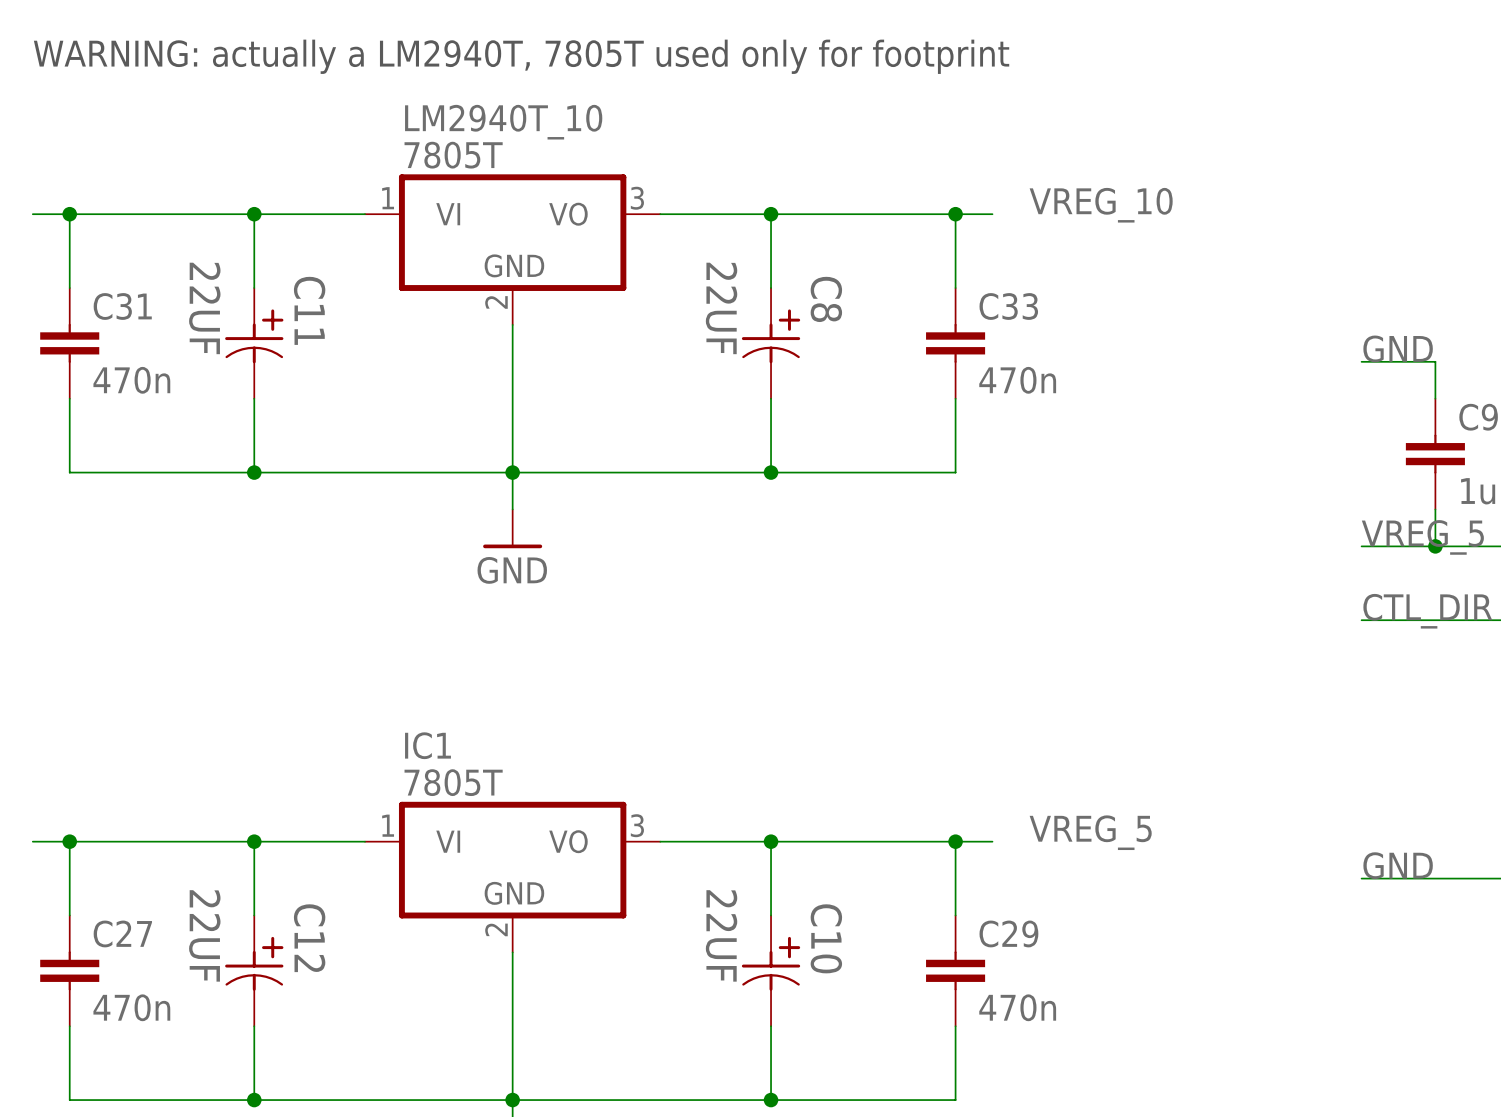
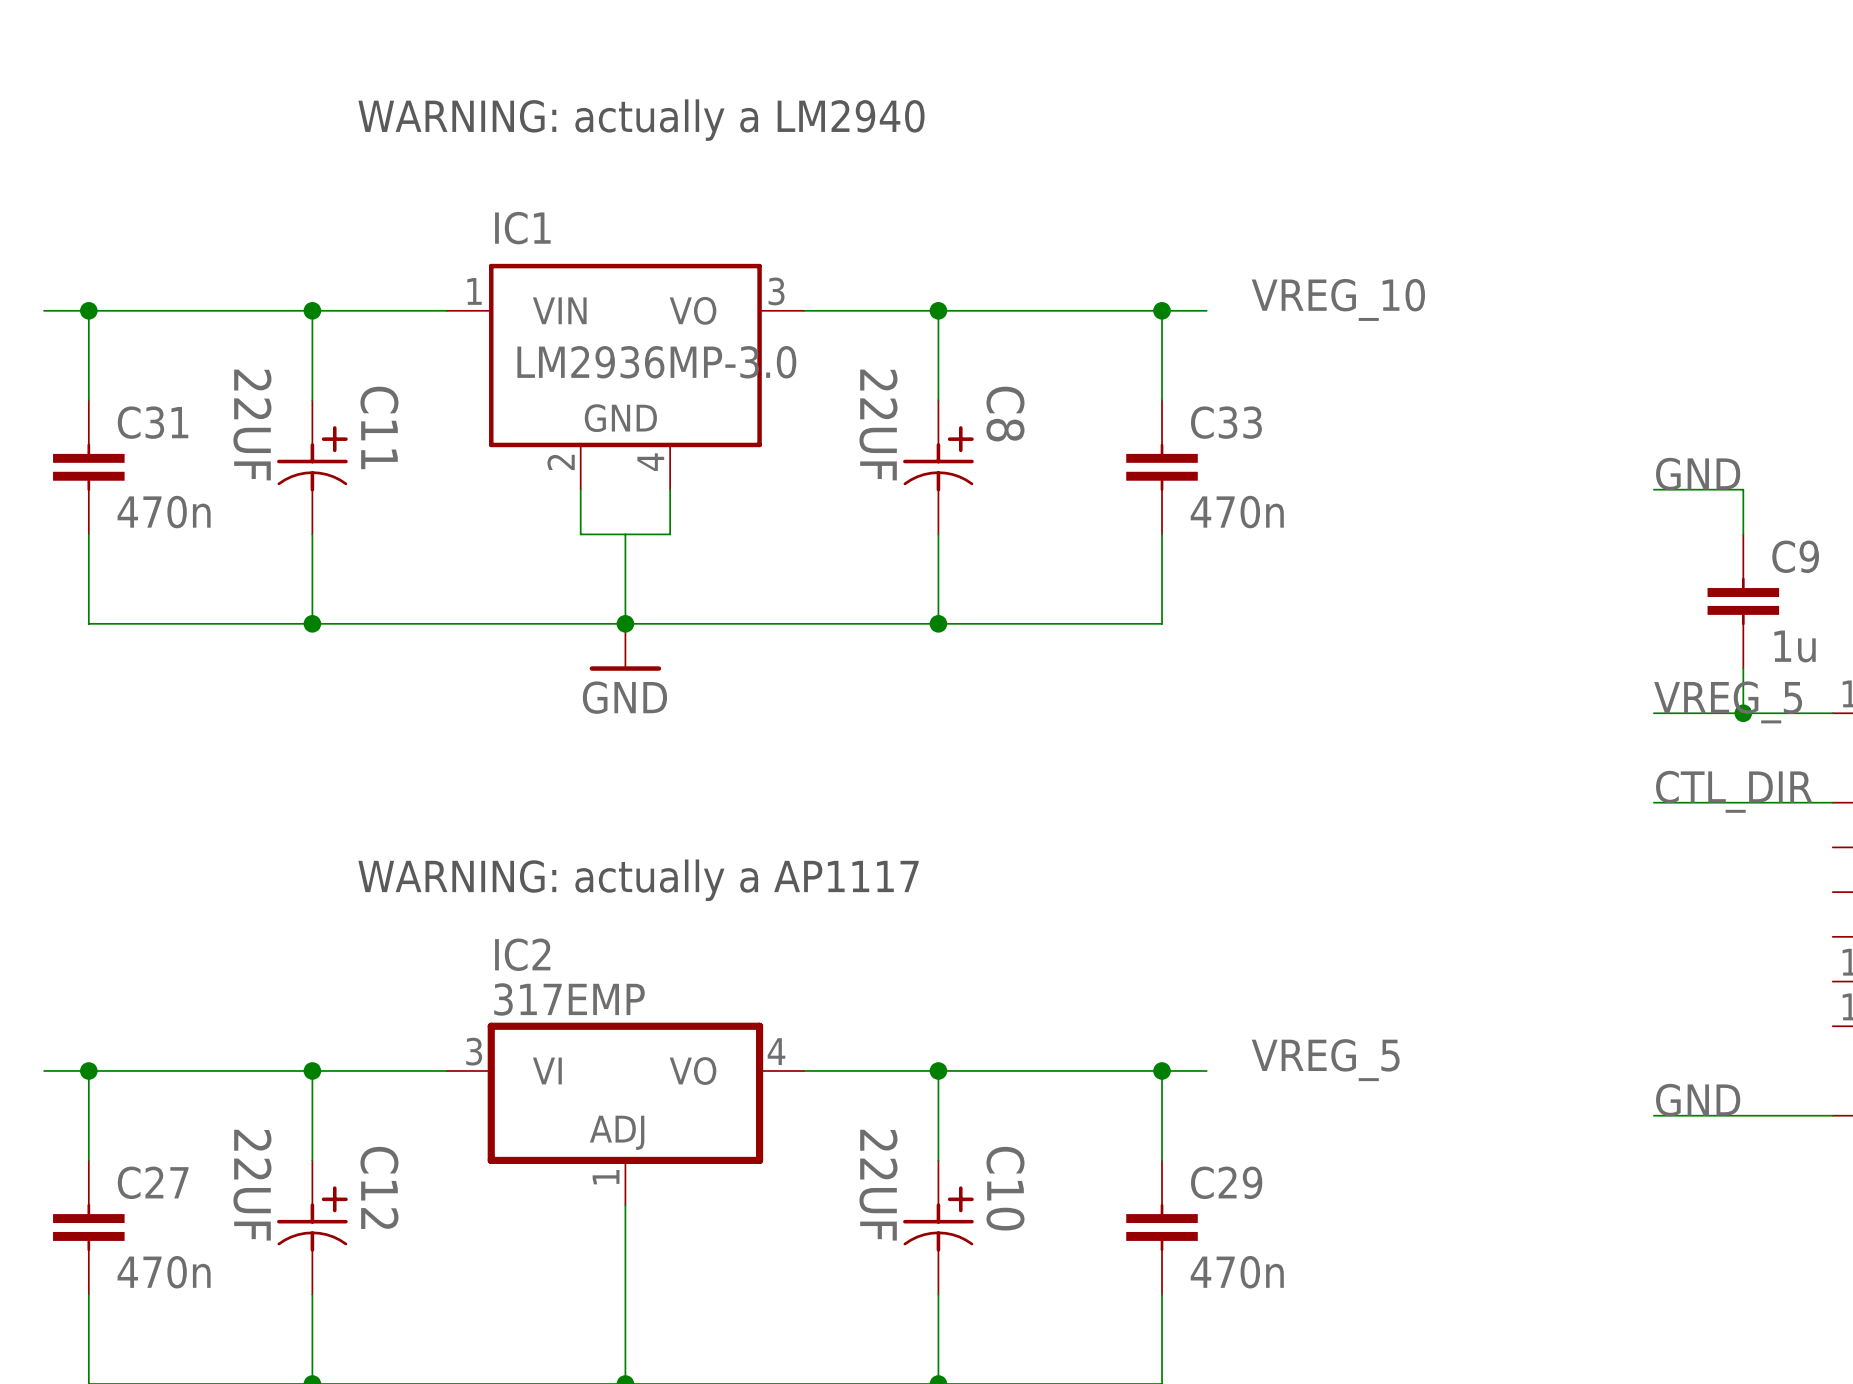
text: WARNING: actually a LM2940T, 7805T used only for footprint (521, 56) -> WARNING: actually a LM2940 (641, 120)
LM2940T_10: 7805T (512, 249) -> none
wire: (512, 324) (512, 398) -> none
wire: none -> (580, 489) (580, 534) (670, 534) (670, 489)
power symbol position: GND (512, 528) -> GND (625, 647)
text: none -> WARNING: actually a AP1117 (638, 880)
IC1 value: 7805T (453, 782) -> LM2936MP-3.0 (656, 362)
IC1 symbol: [365, 801, 661, 953] -> [446, 263, 805, 490]
IC2: none -> 317EMP (625, 1113)

